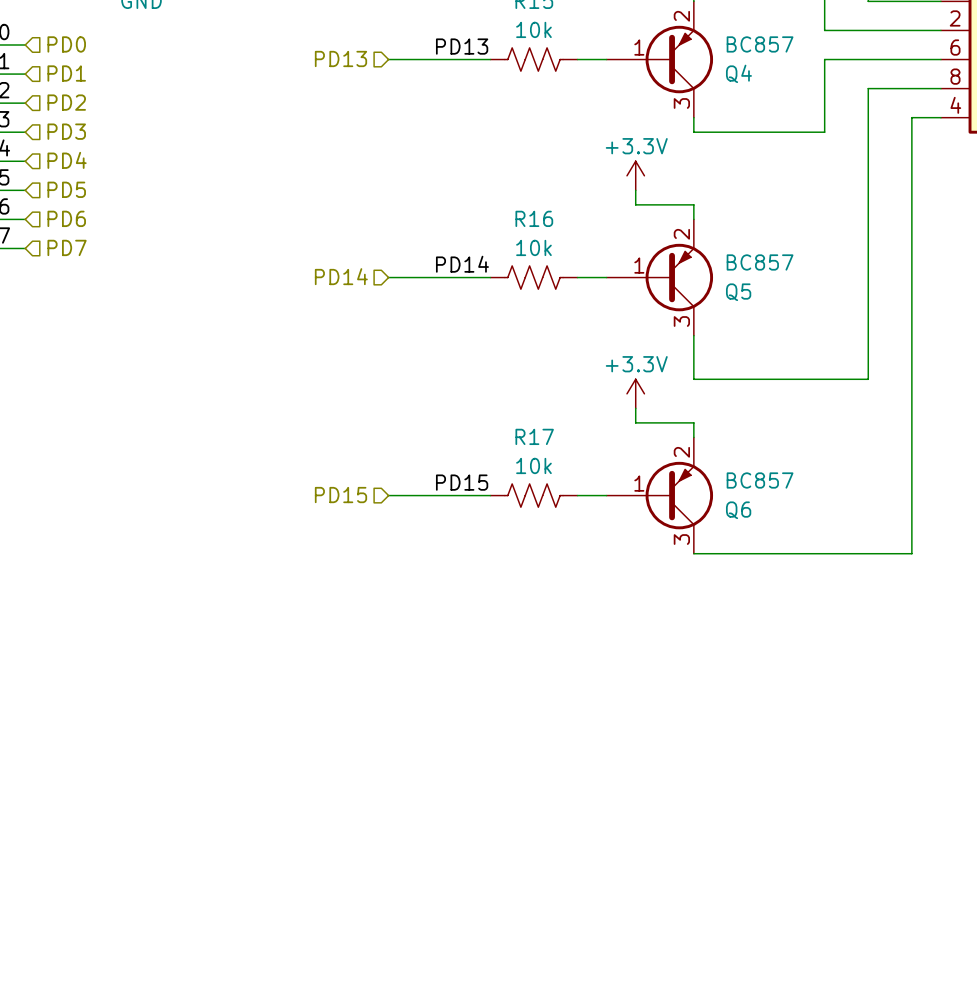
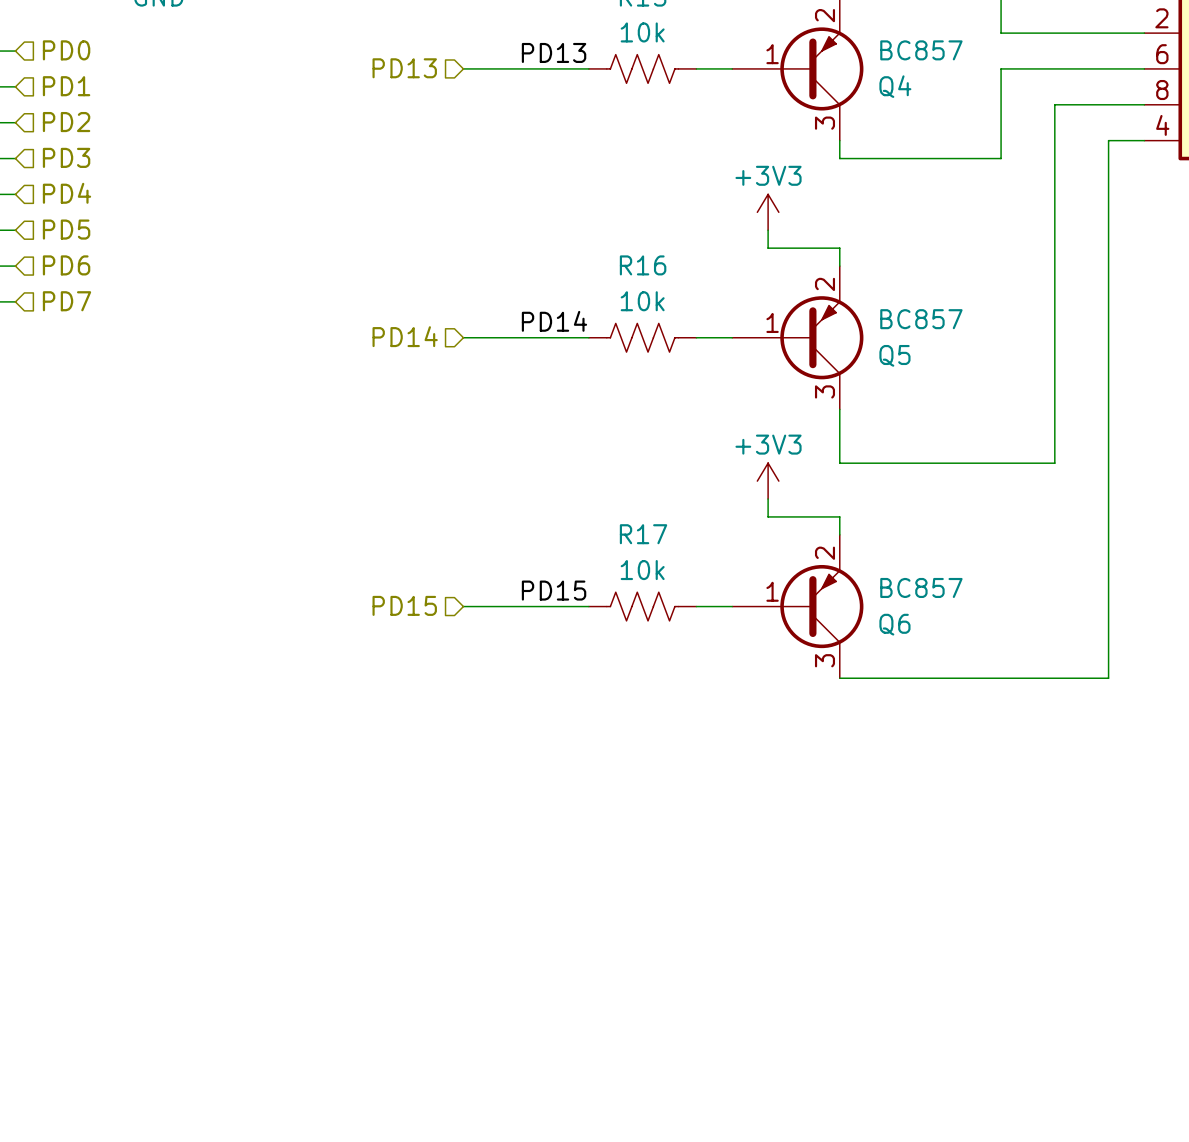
power symbol: +3.3V (635, 175) -> +3V3 (768, 212)
power symbol: +3.3V (635, 393) -> +3V3 (768, 481)

